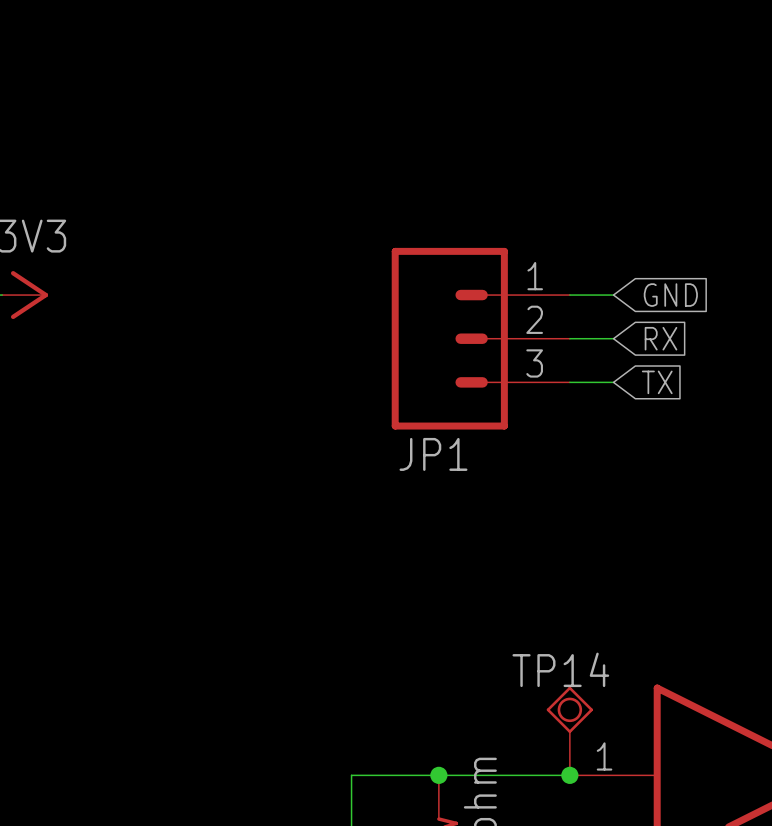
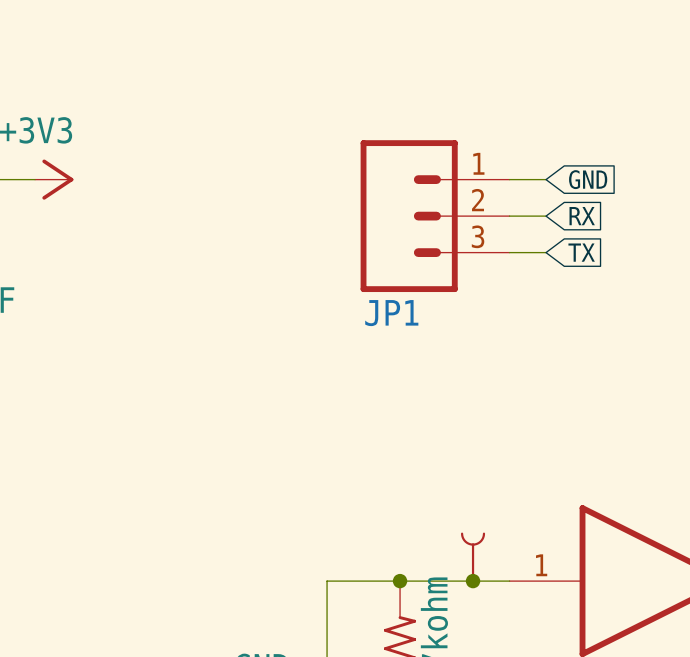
TP14: (569, 731) -> none
part: none -> (473, 557)
junction position: (569, 775) -> (473, 581)

